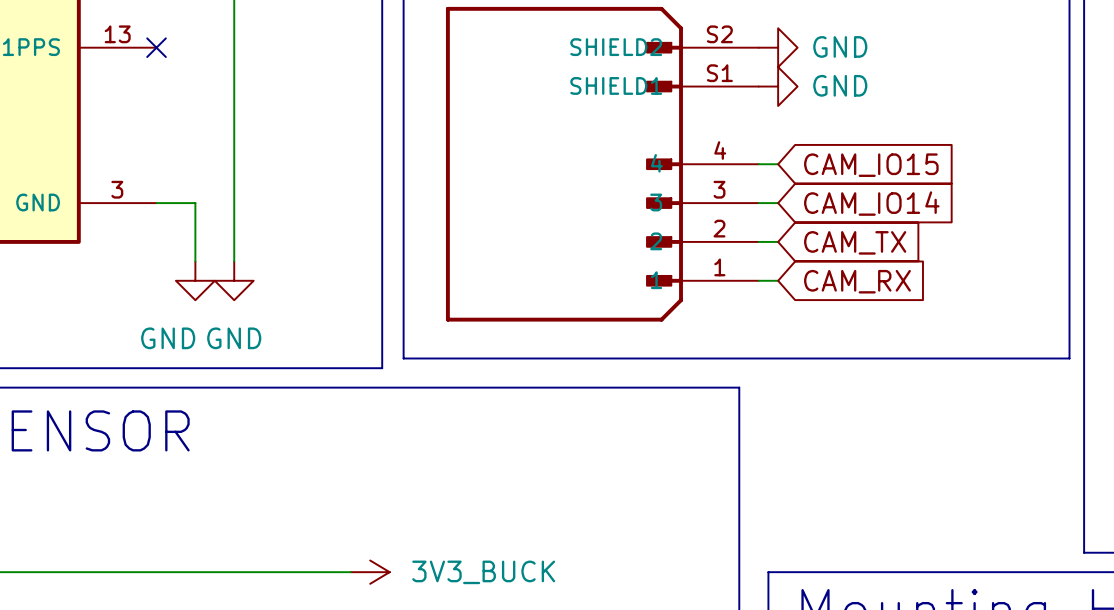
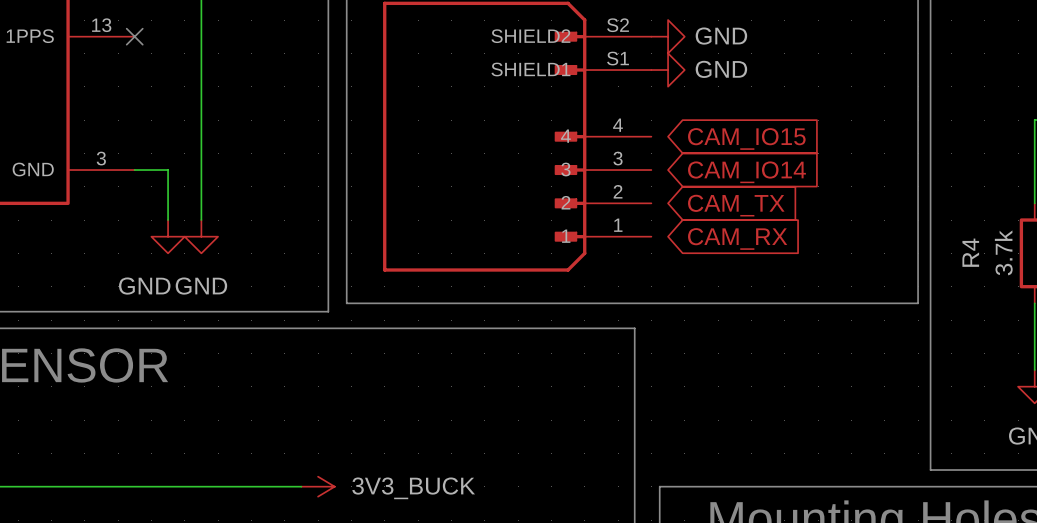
wire: (758, 164) (778, 164) -> none
wire: (758, 203) (778, 203) -> none
wire: (758, 241) (778, 241) -> none
wire: (758, 280) (778, 280) -> none

